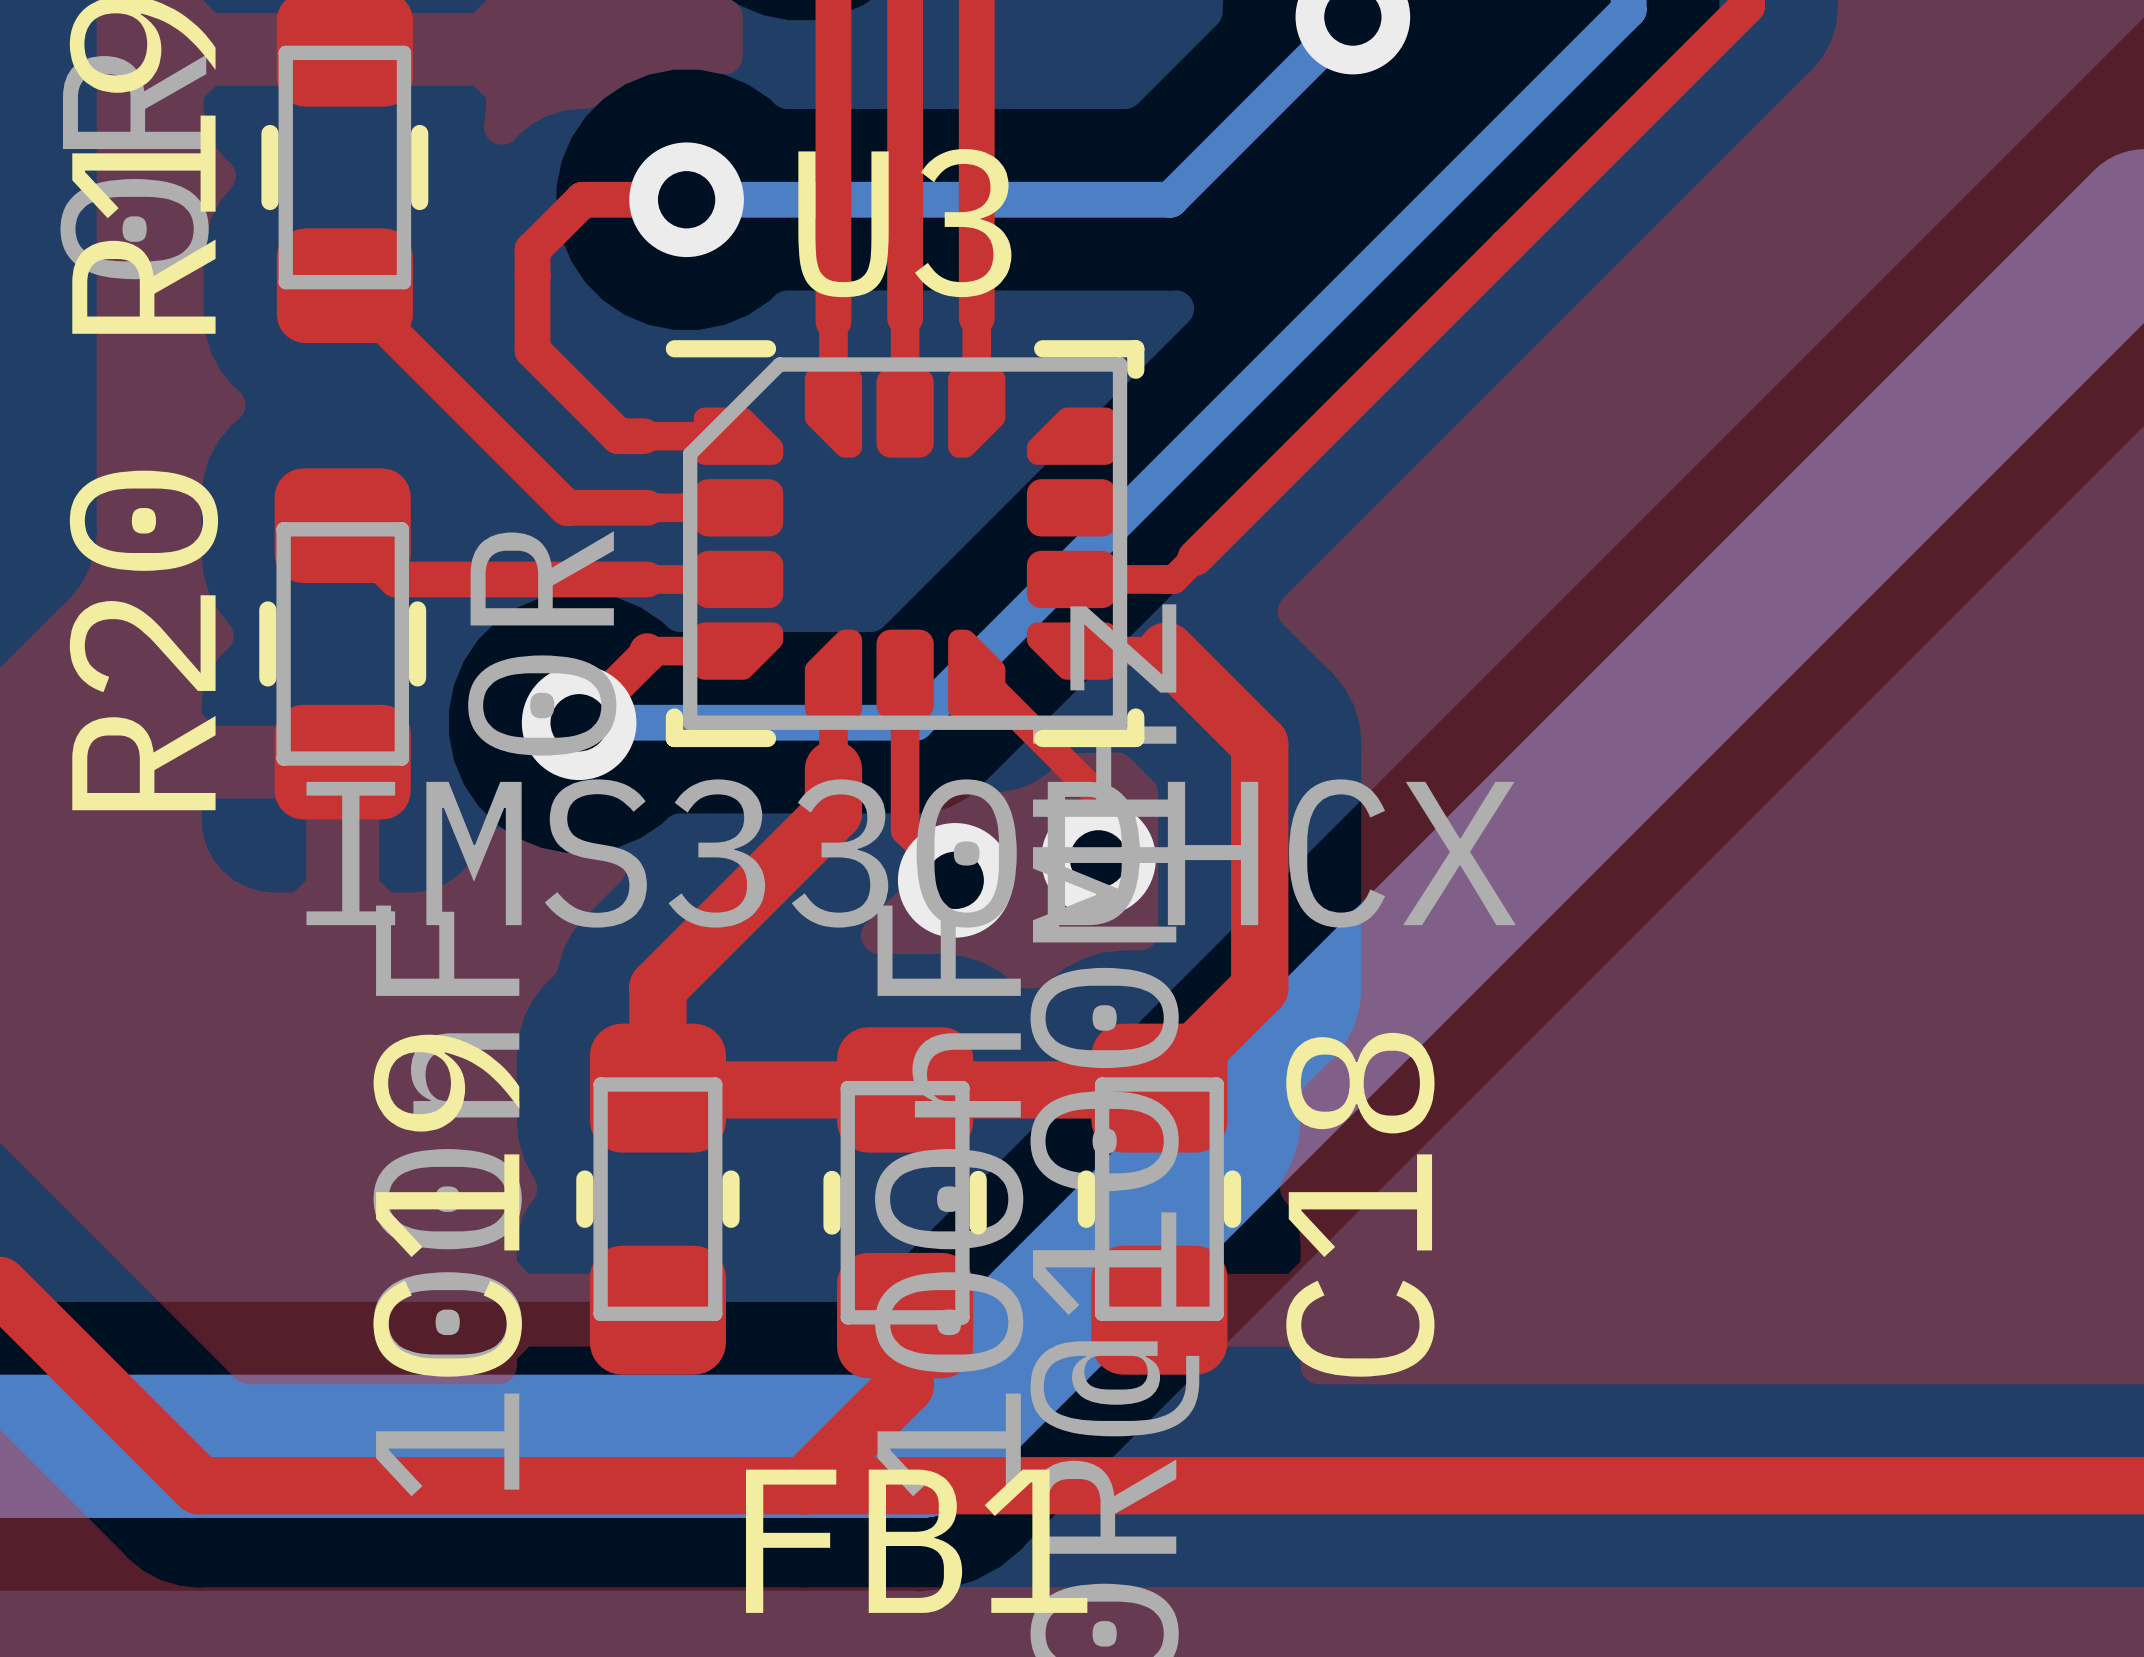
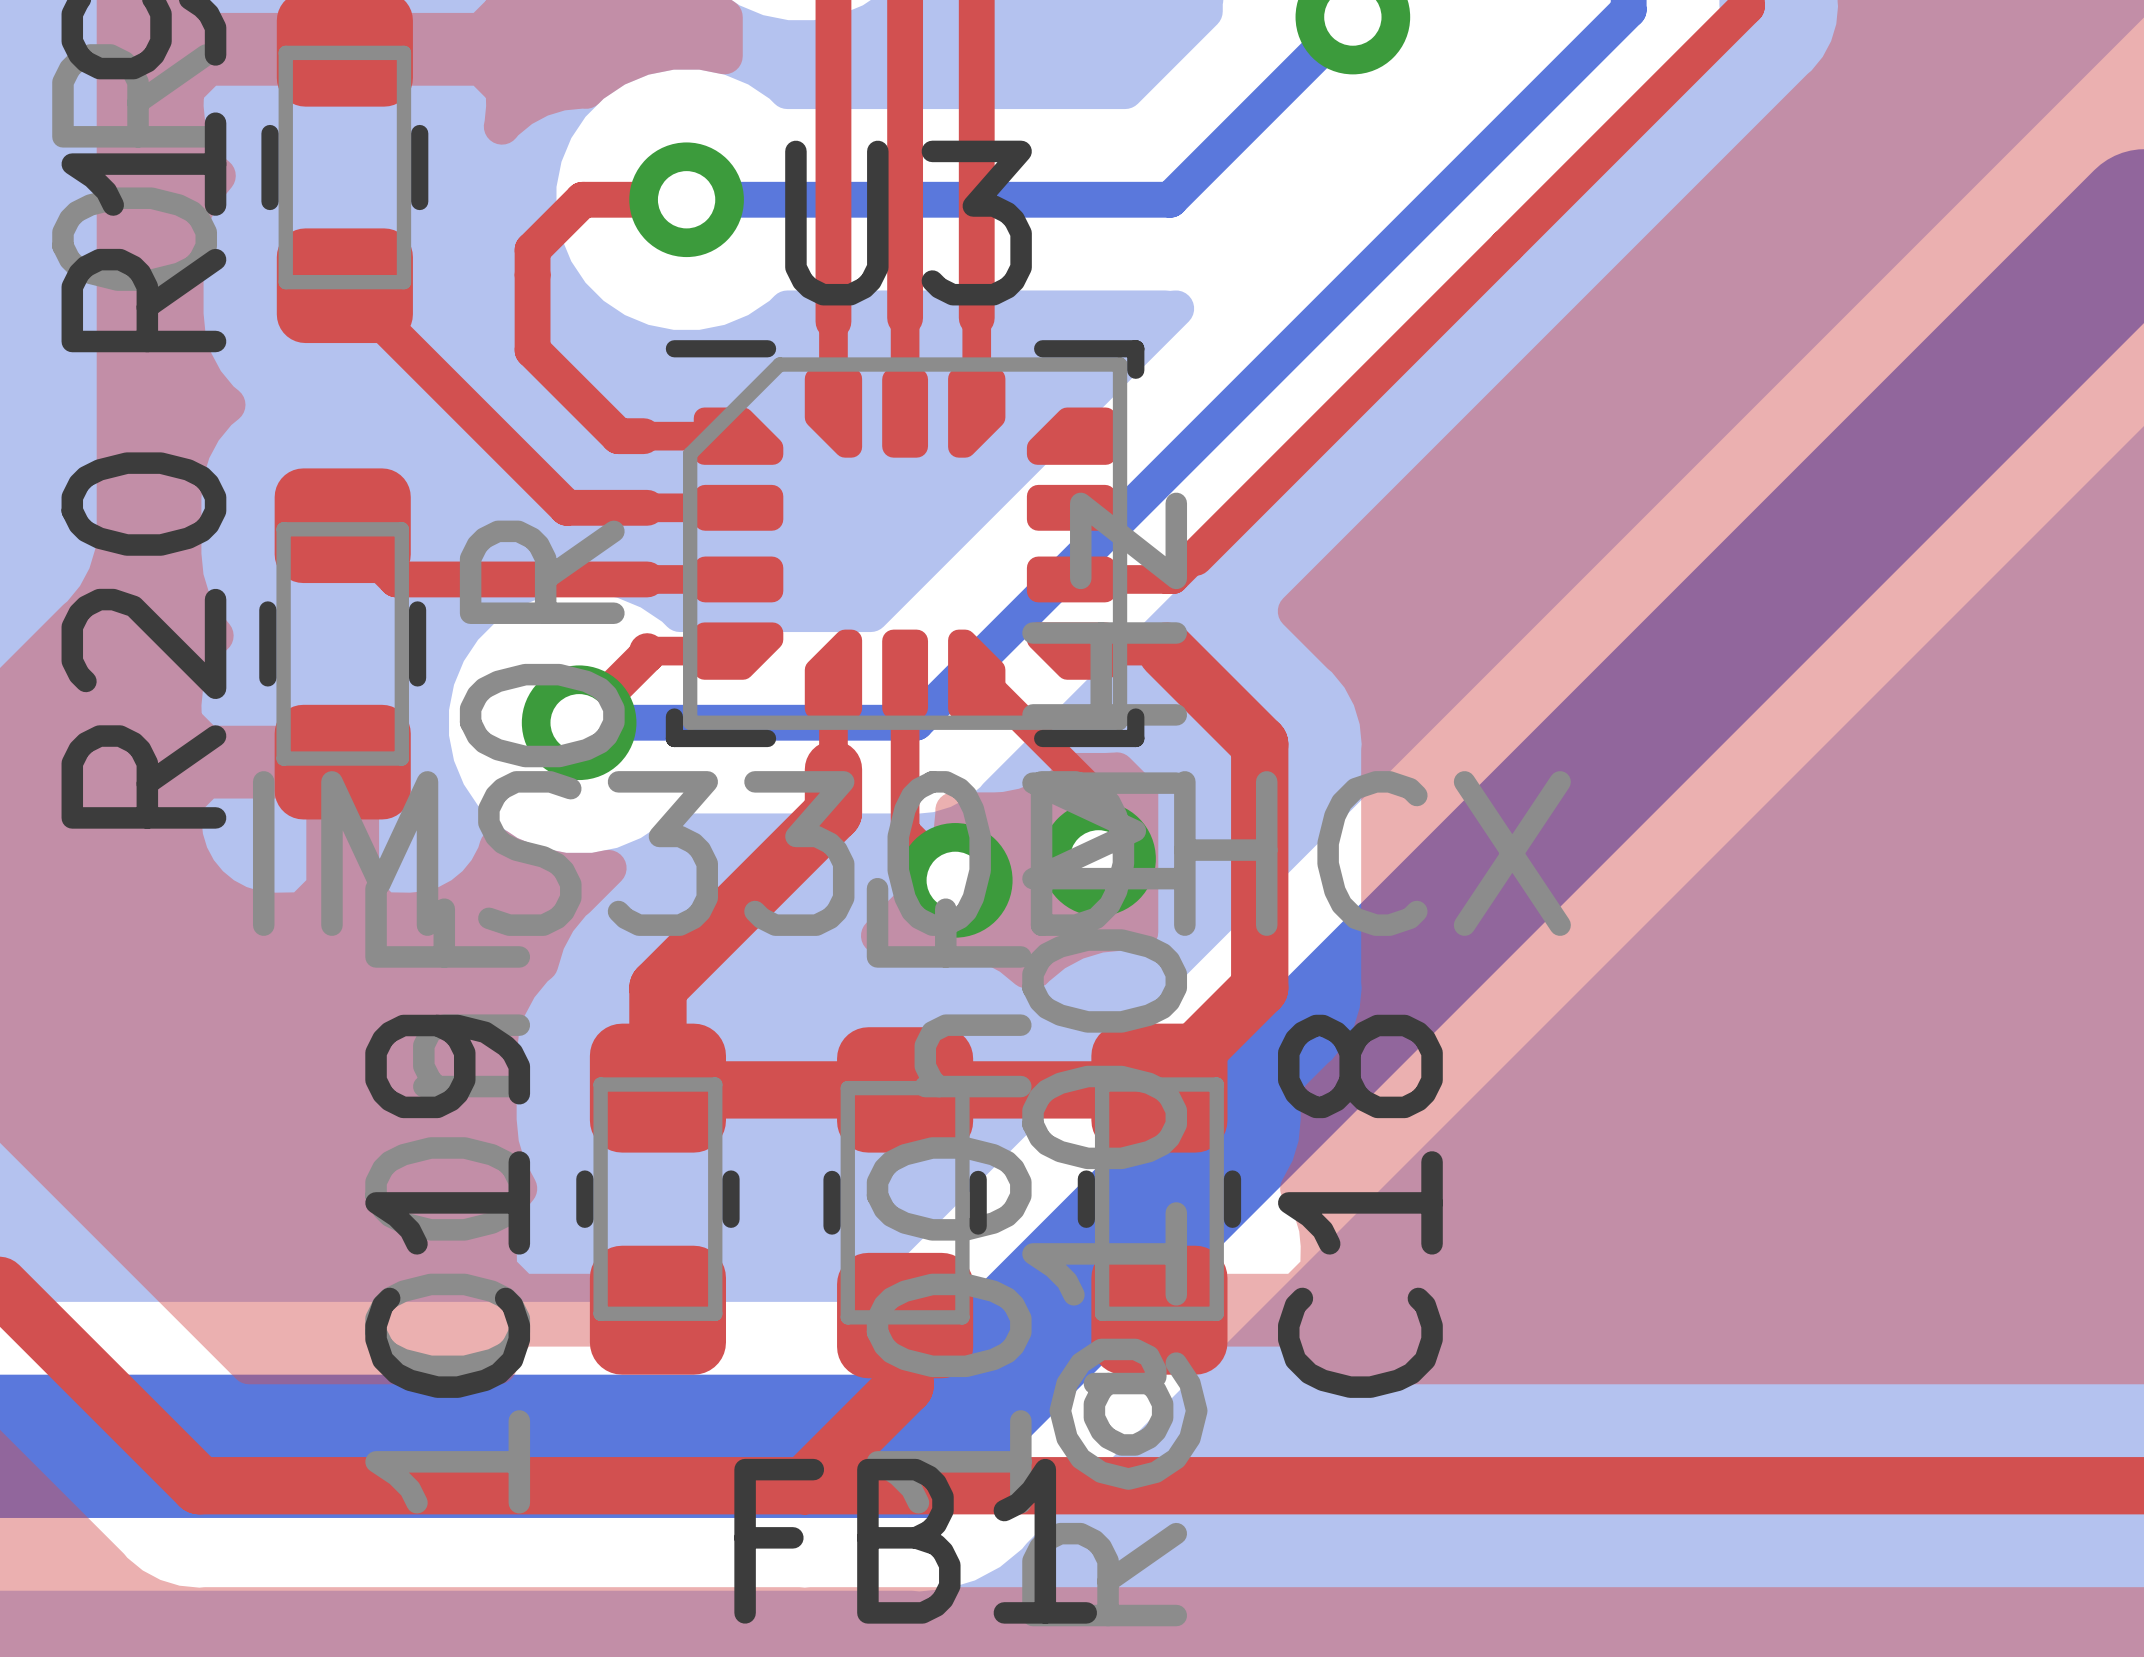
U3 footprint: [665, 340, 1145, 748] -> [665, 340, 1145, 748]

